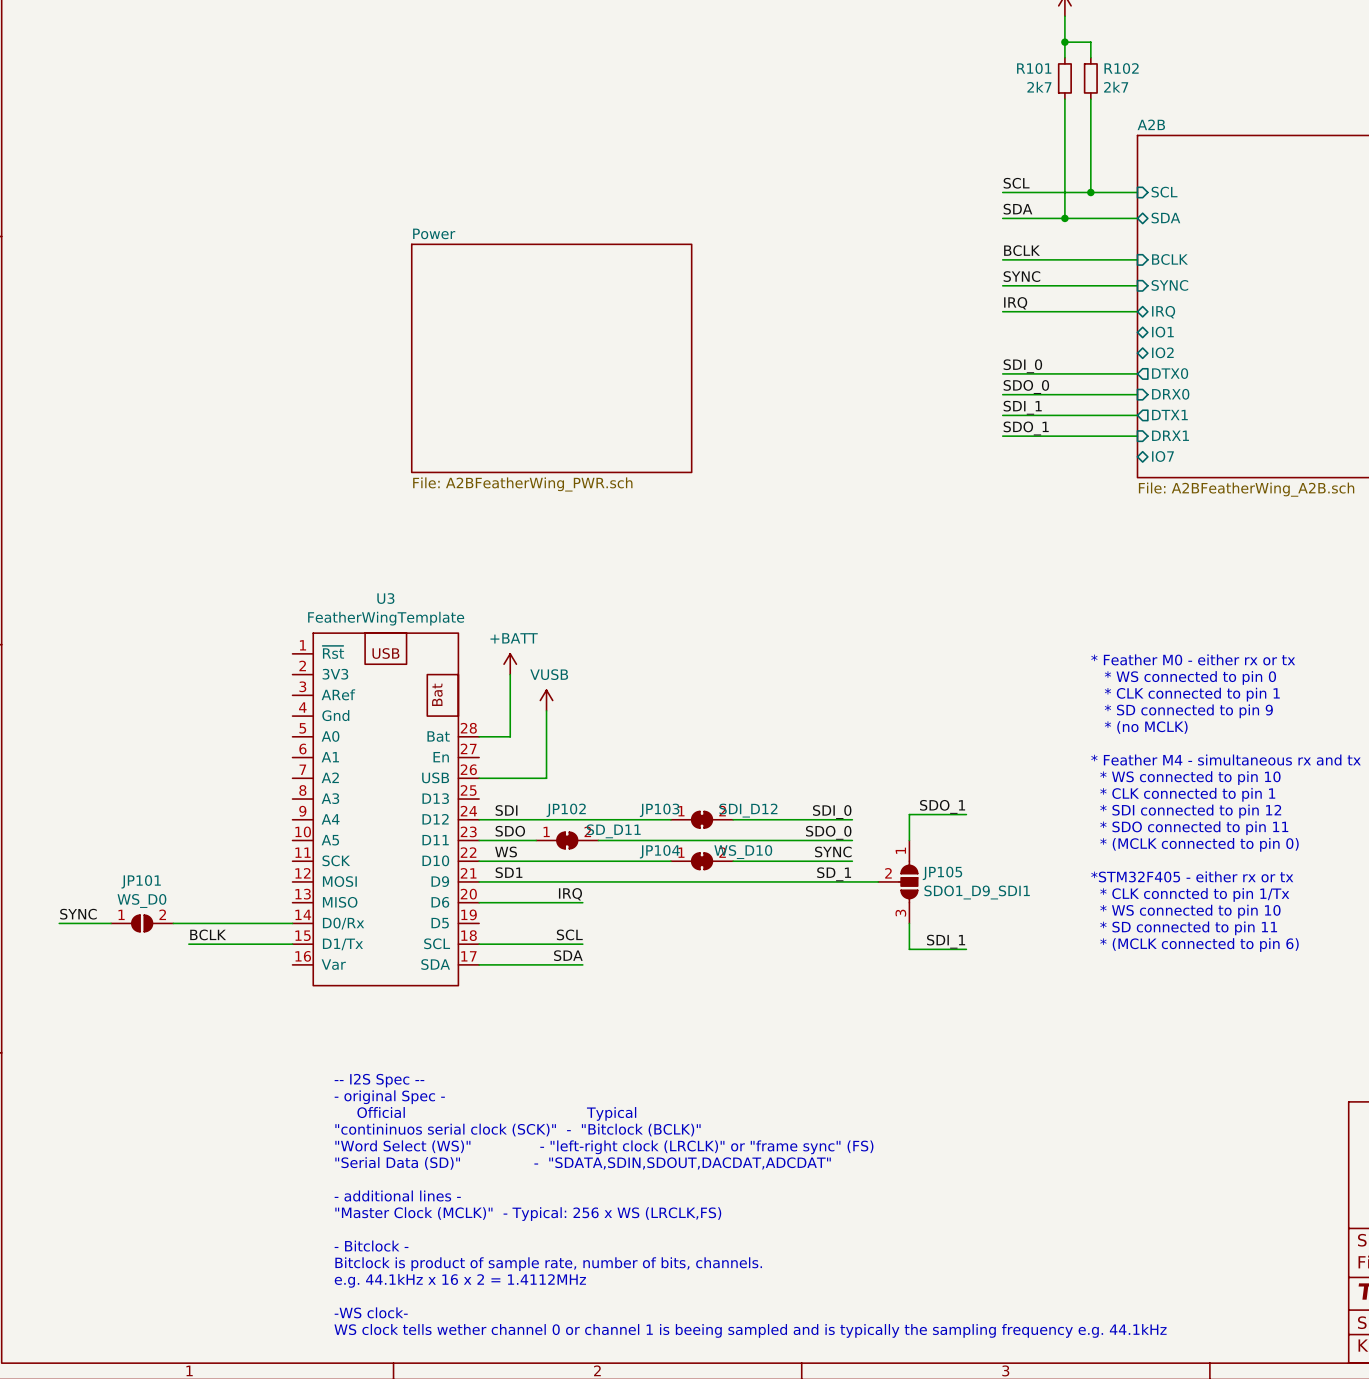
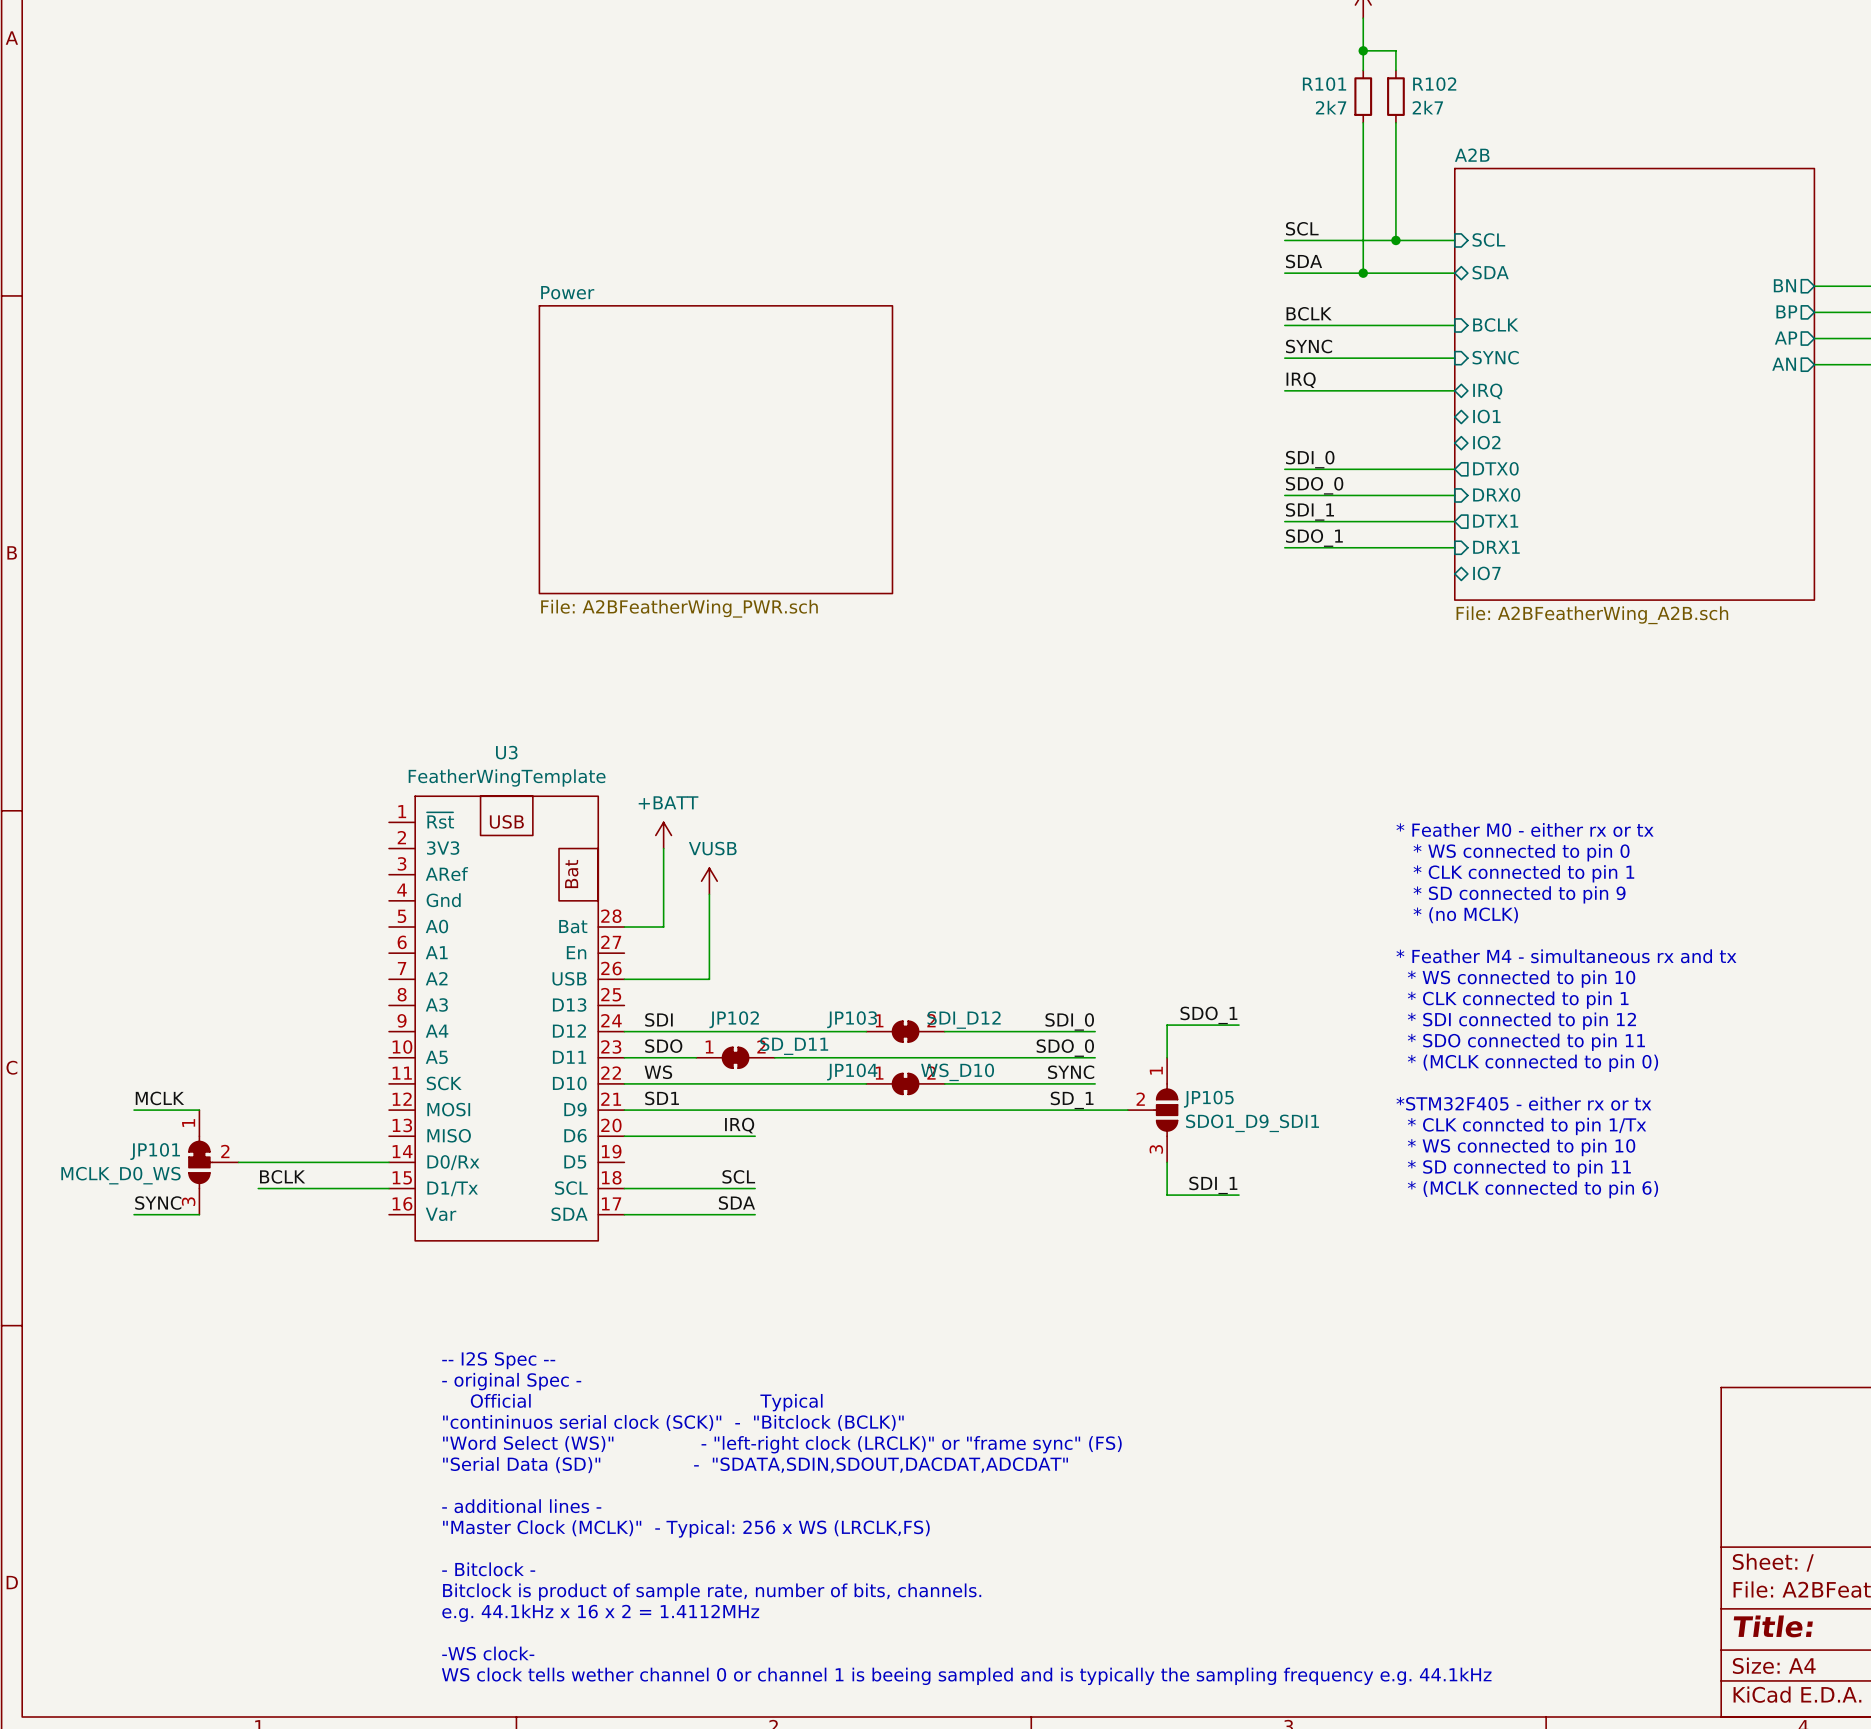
label: none -> MCLK (159, 1098)
wire: none -> (134, 1110) (199, 1110)
JP101 name position: JP101 (141, 881) -> JP101 (155, 1151)
JP101 value: WS_D0 (141, 900) -> MCLK_D0_WS (120, 1175)
label position: SYNC (78, 914) -> SYNC (158, 1203)
JP101 symbol: [111, 915, 174, 932] -> [188, 1110, 239, 1215]
wire: (59, 923) (111, 923) -> (134, 1214) (199, 1214)

